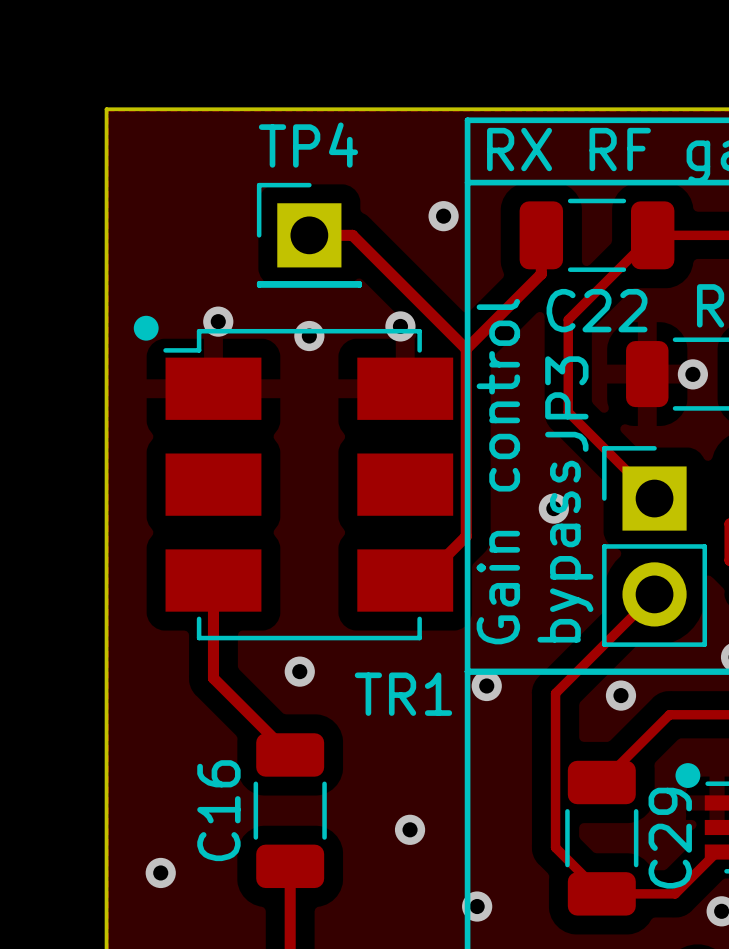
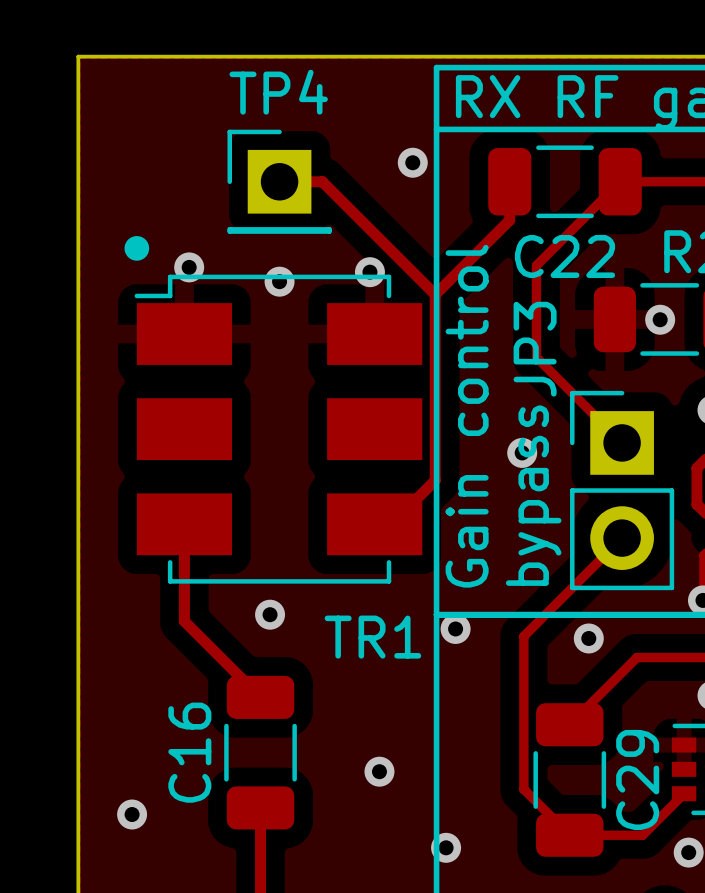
drawing position: (146, 328) -> (136, 248)
drawing: [675, 763, 701, 788] -> none

